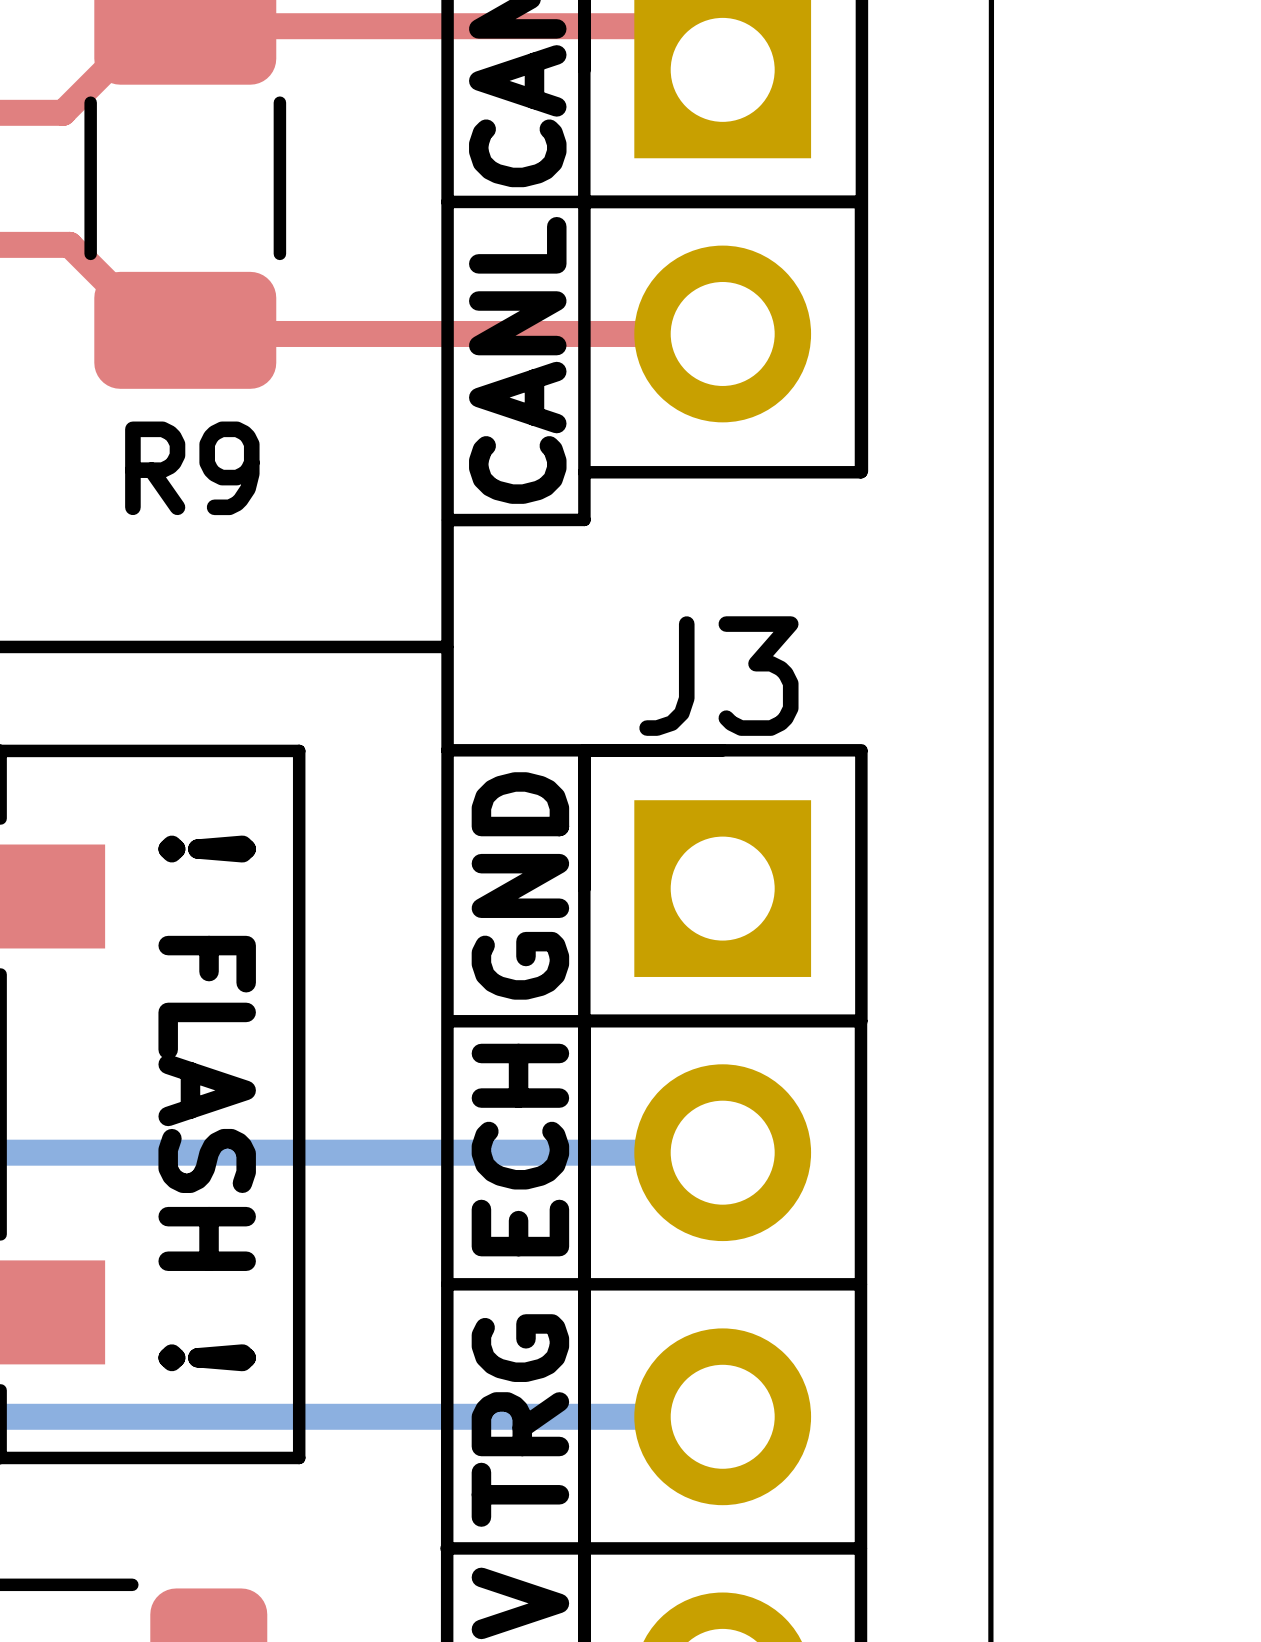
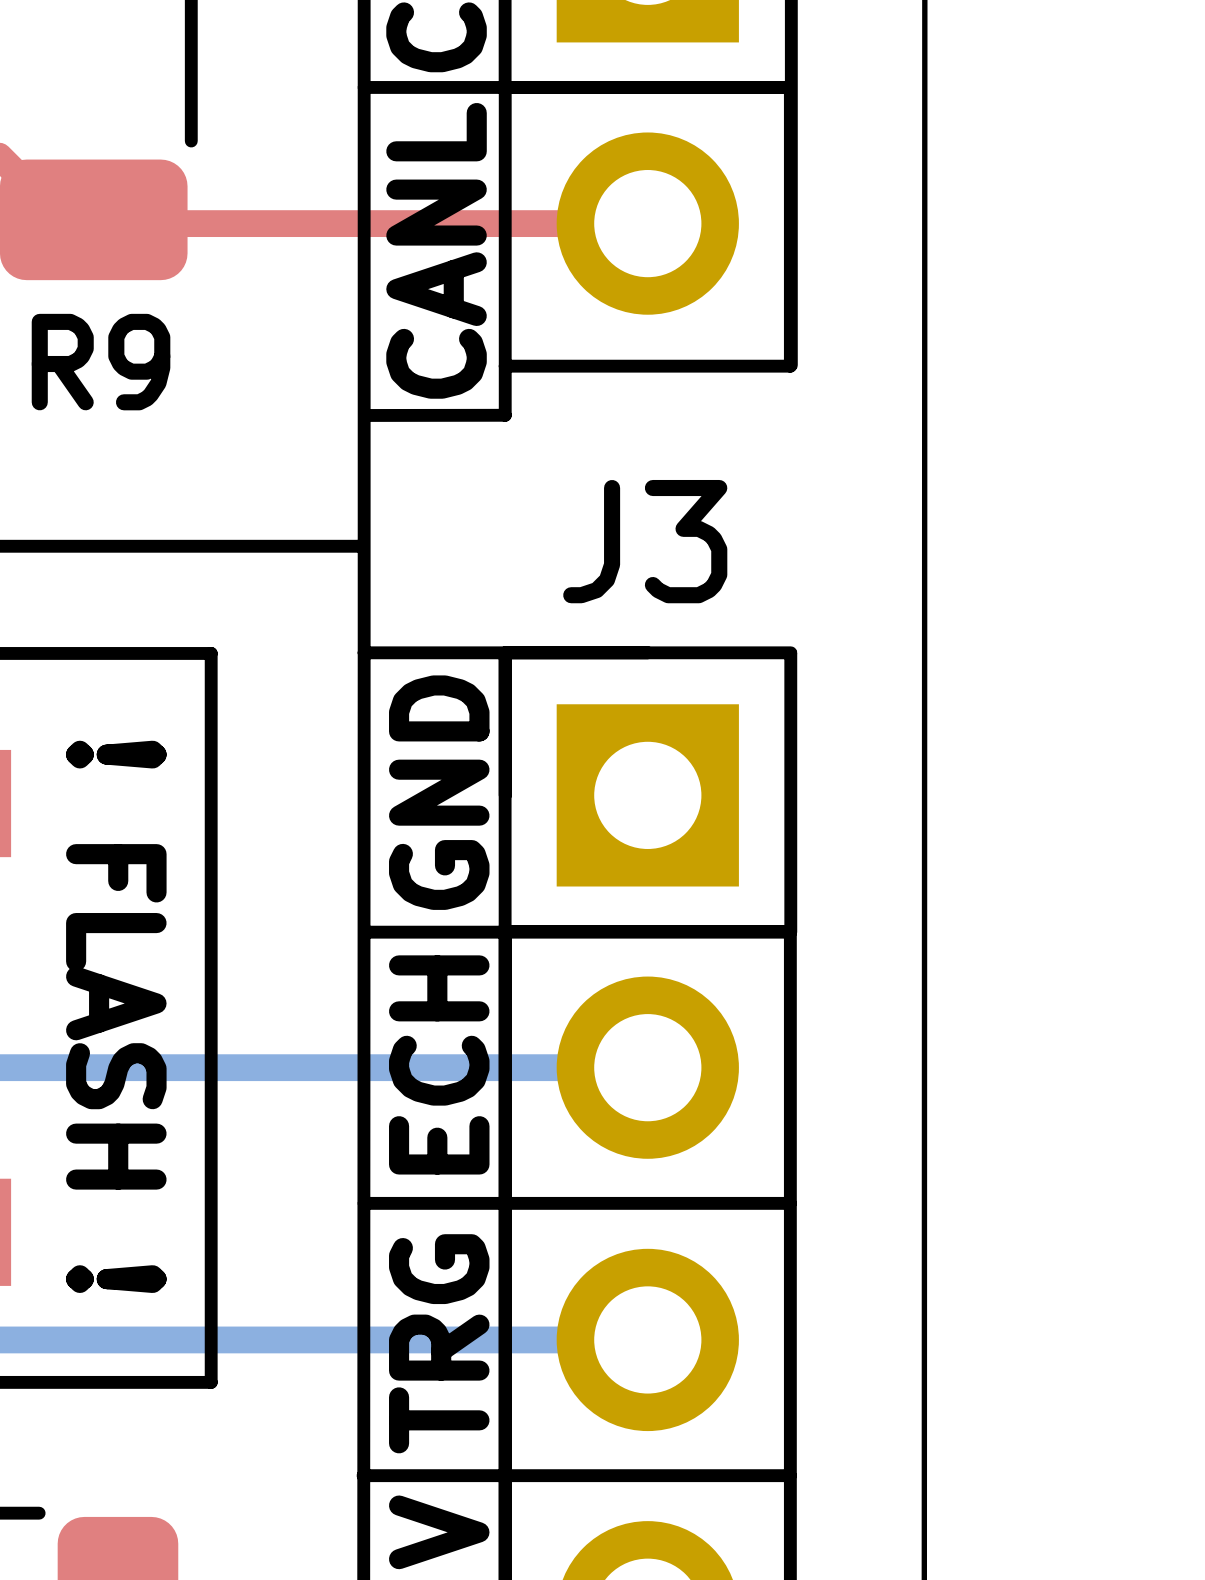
J3 name position: J3 (718, 676) -> J3 (645, 541)

